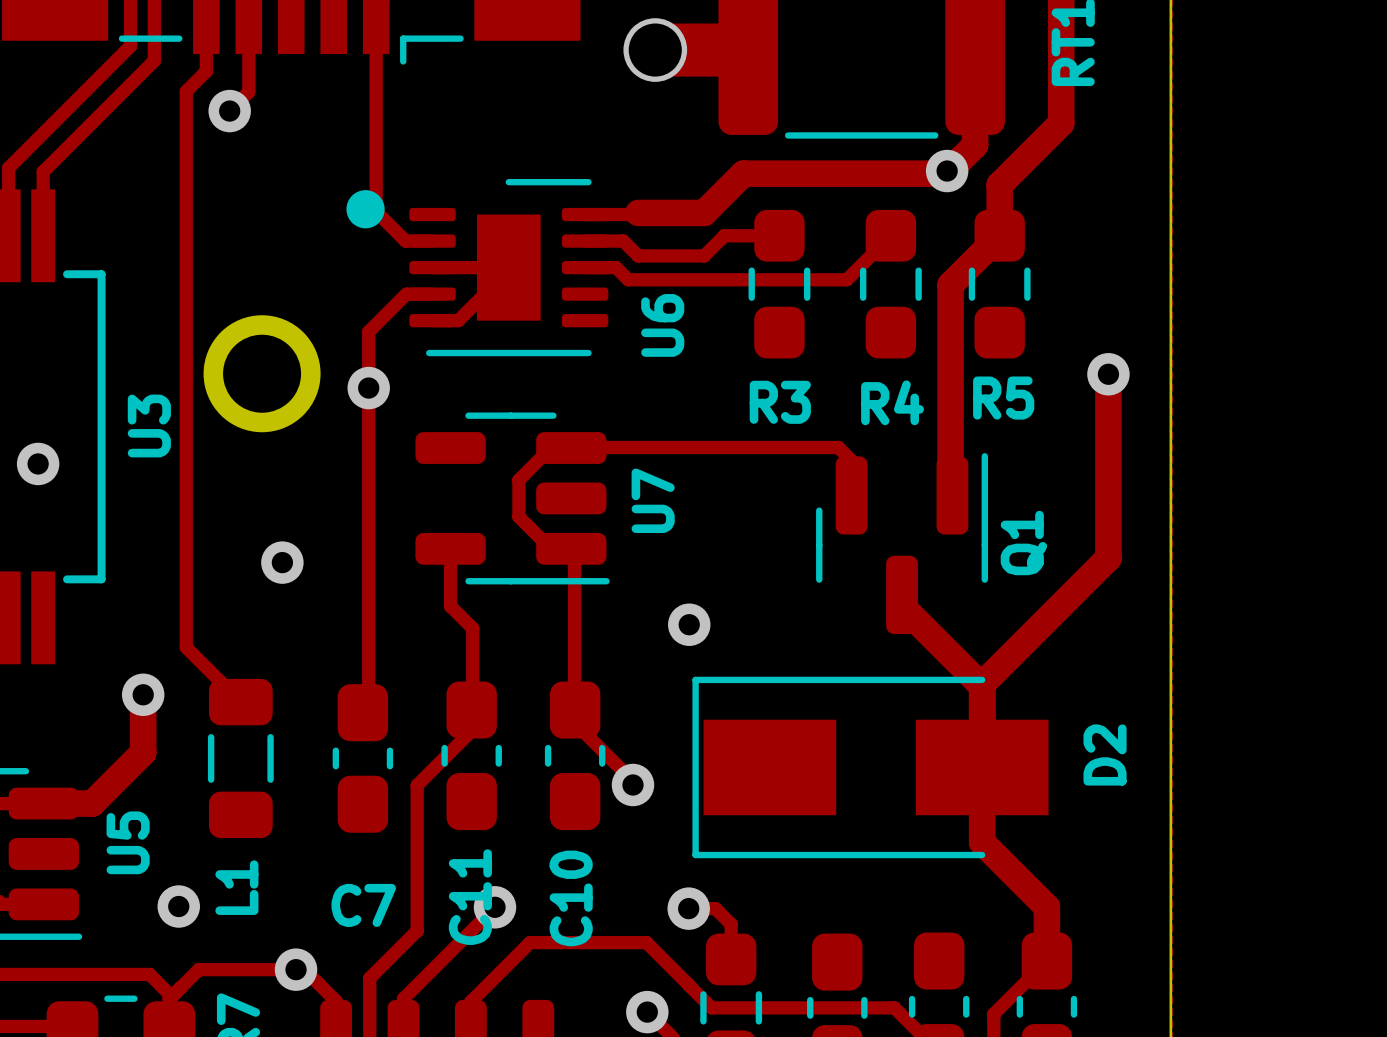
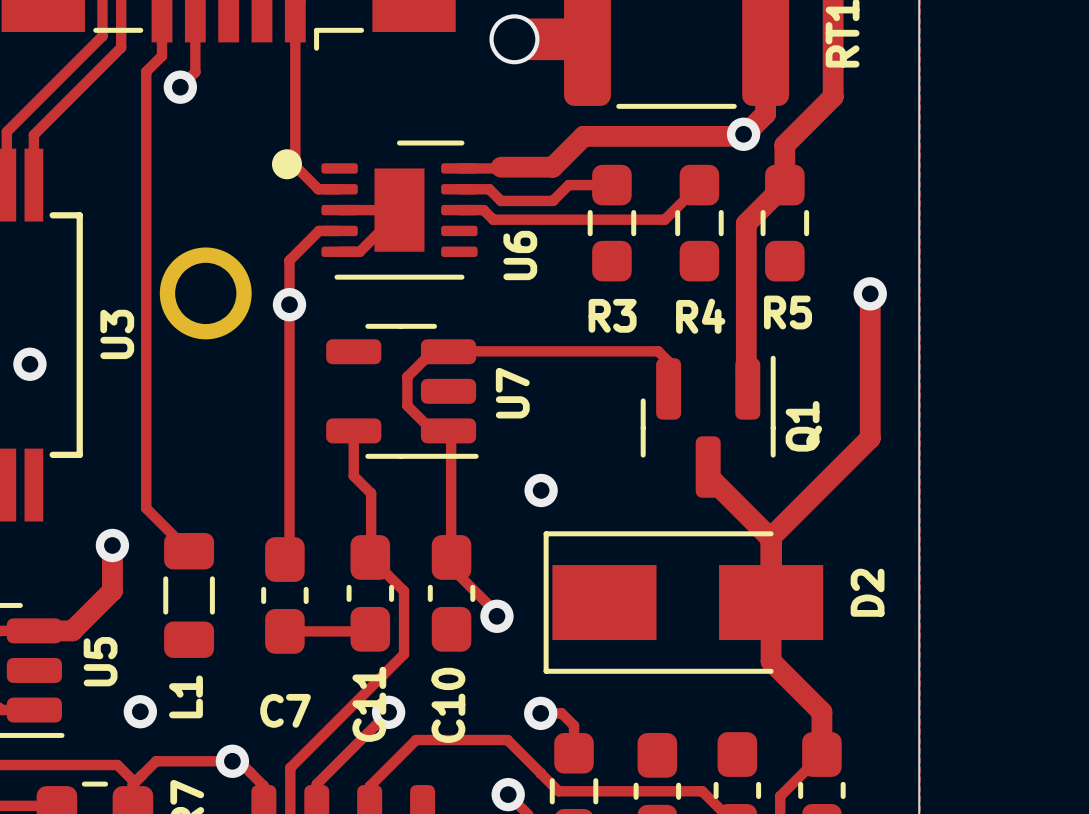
via: (282, 562) -> none
track: (471, 710) (471, 730) (417, 785) (417, 930) -> (370, 557) (404, 591) (404, 654) (327, 730)
track: none -> (284, 631) (368, 631)

